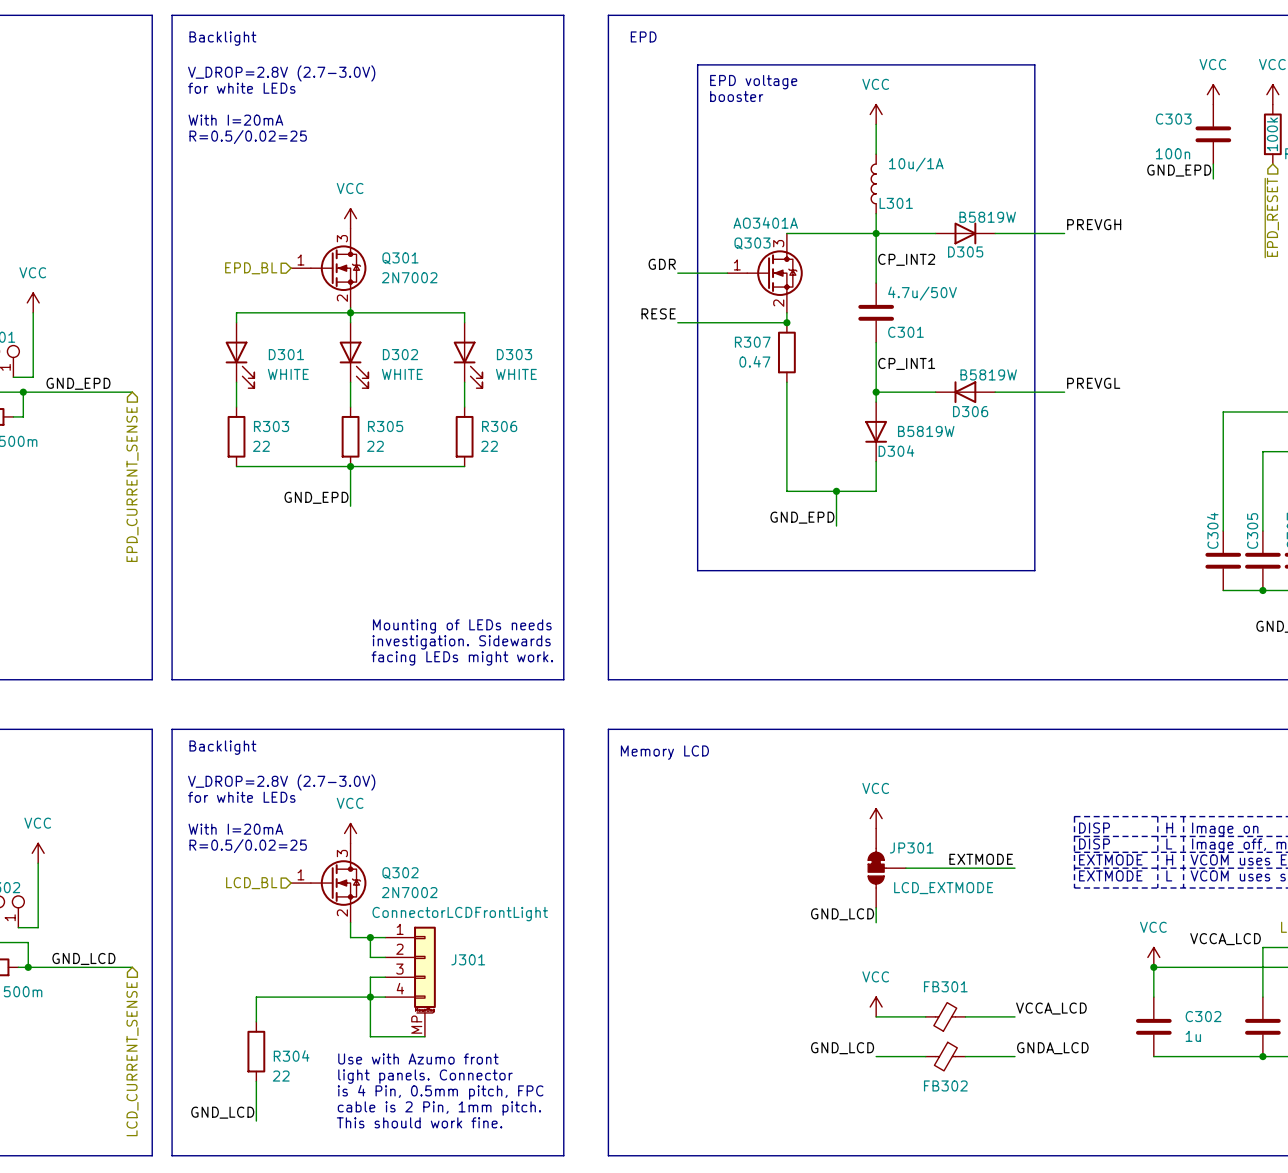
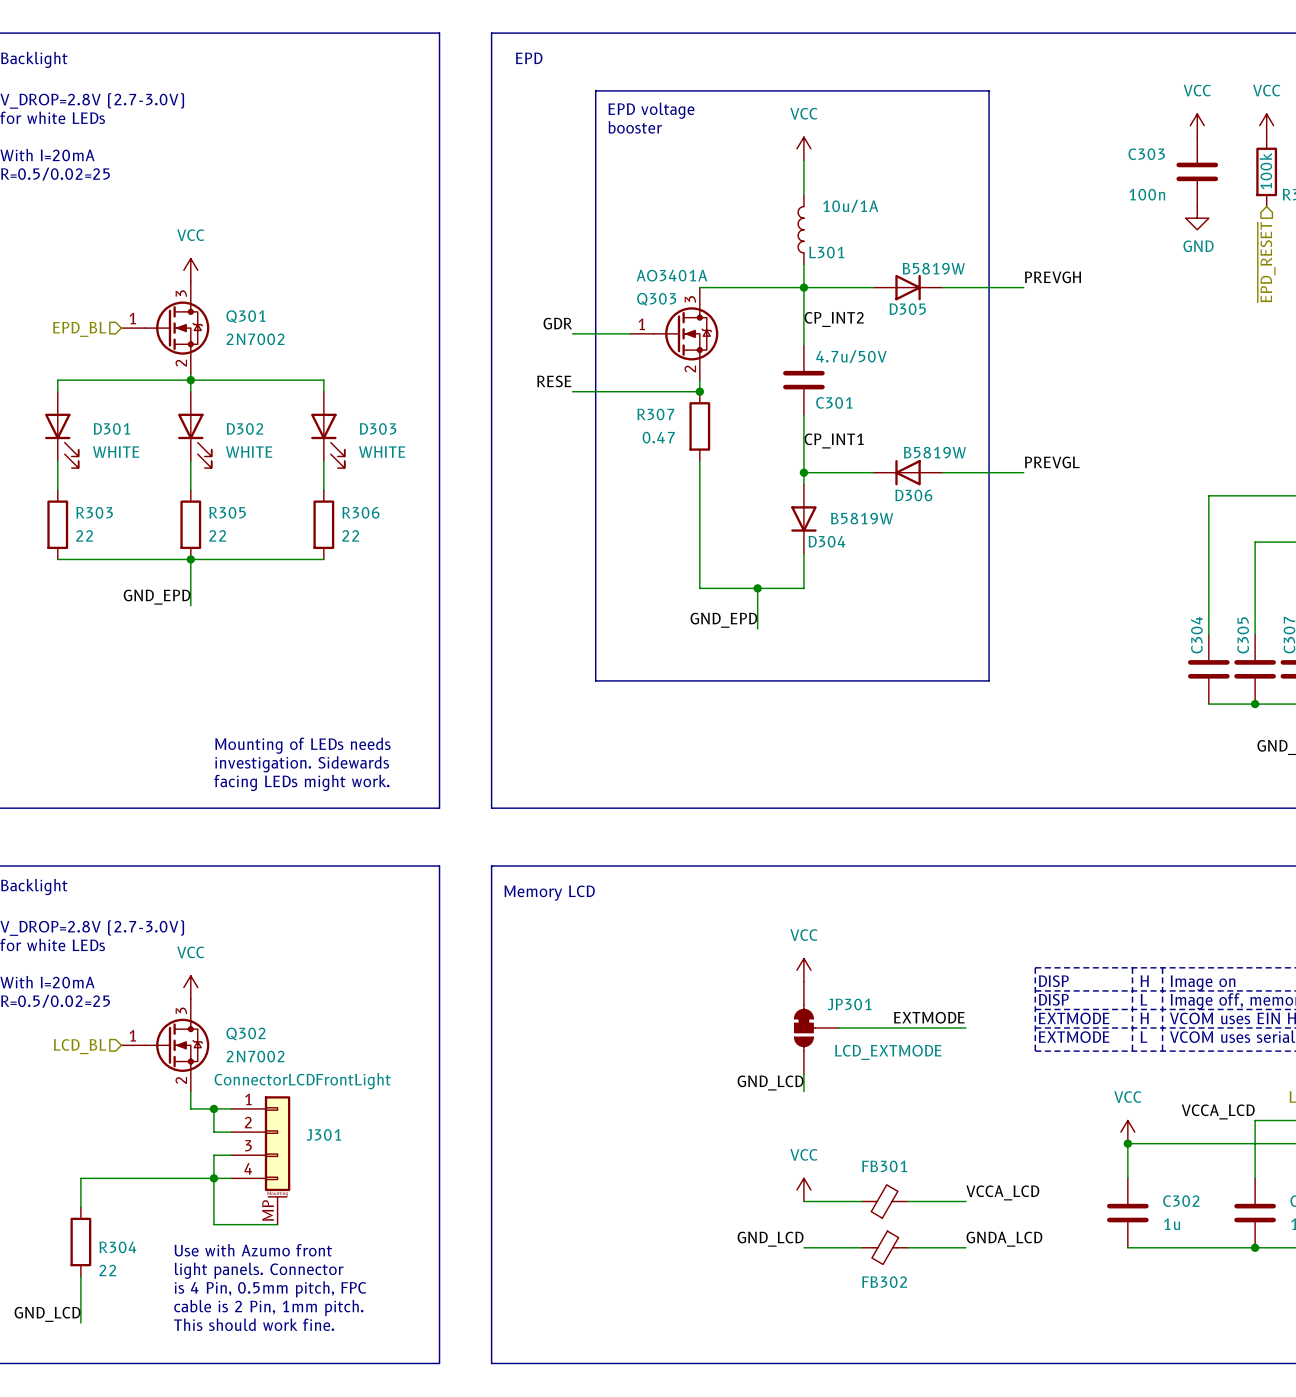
label: GND_EPD (1179, 170) -> none
power symbol: none -> GND (1197, 218)

